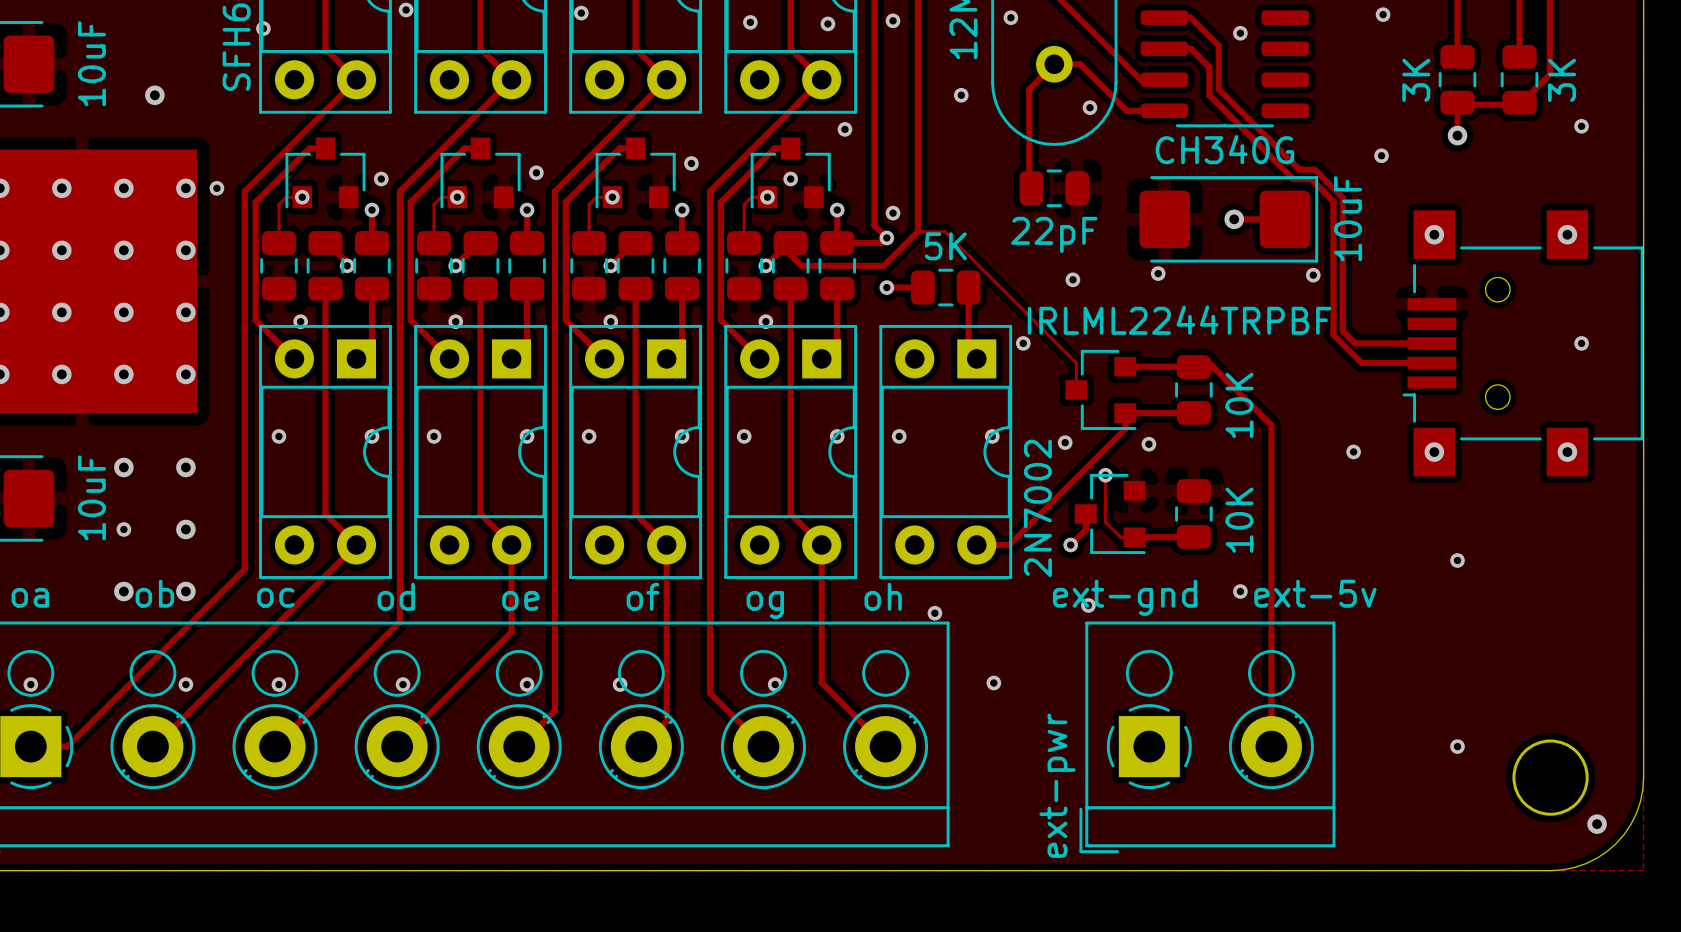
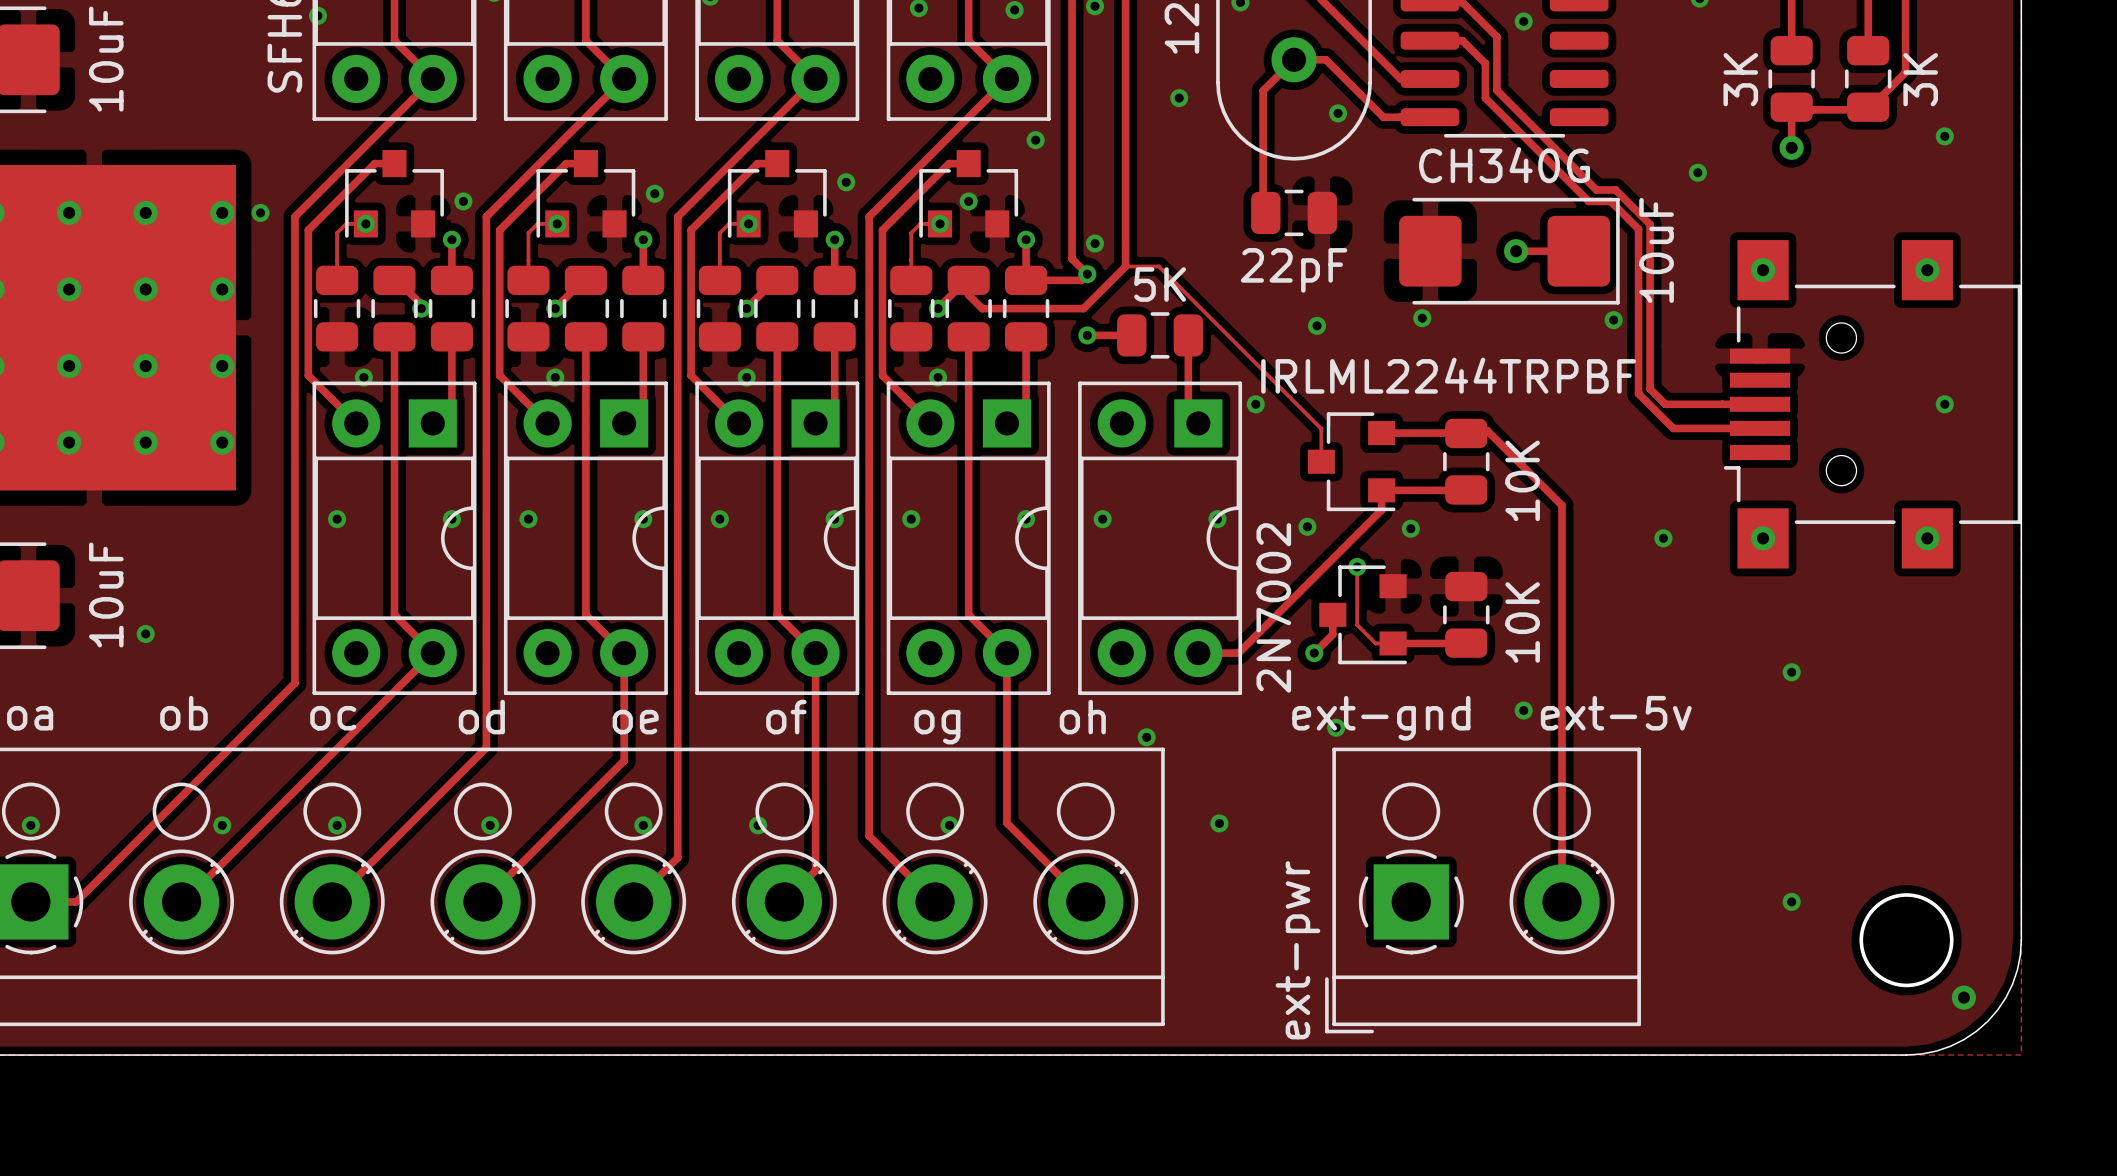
via: (154, 95) -> none
via: (123, 467) -> none
via: (185, 467) -> none
via: (185, 529) -> none
via: (123, 591) -> none
via: (185, 591) -> none

